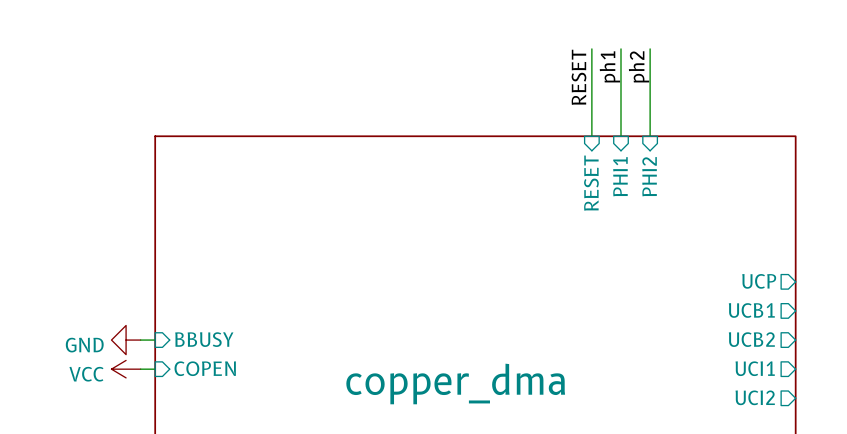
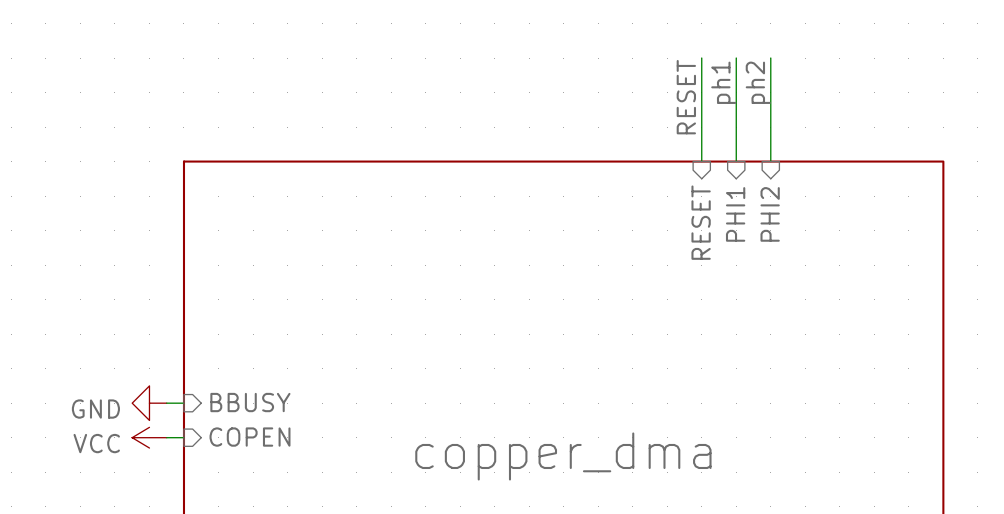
sheet pin: UCP (759, 281) -> none
sheet pin: UCB1 (751, 310) -> none
sheet pin: UCB2 (751, 339) -> none
sheet pin: UCI1 (755, 368) -> none
sheet pin: UCI2 (755, 397) -> none

